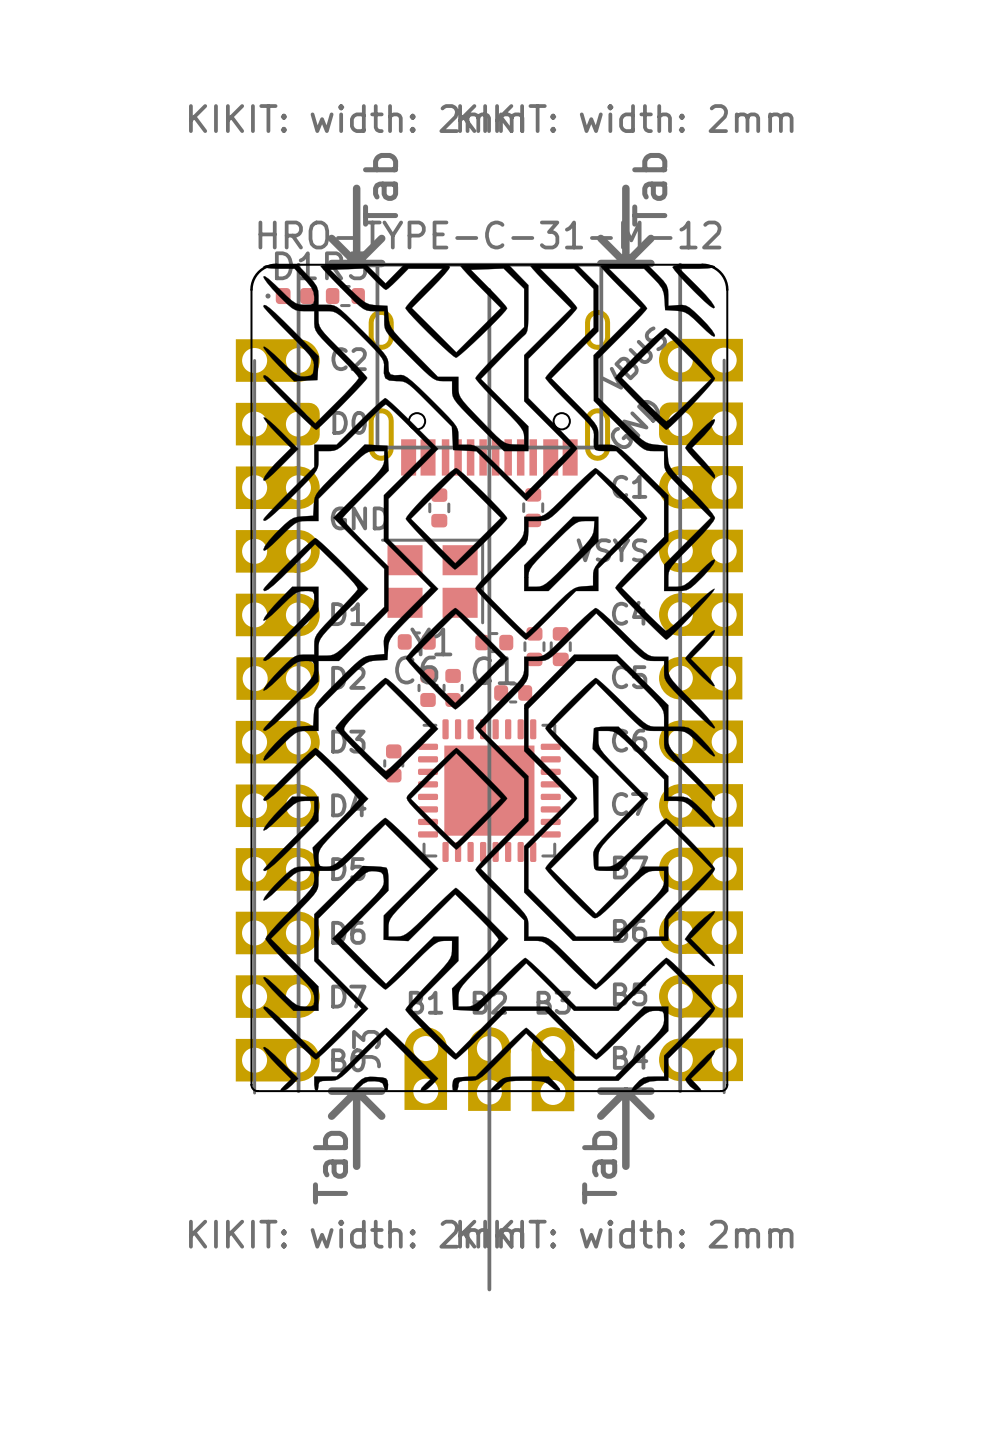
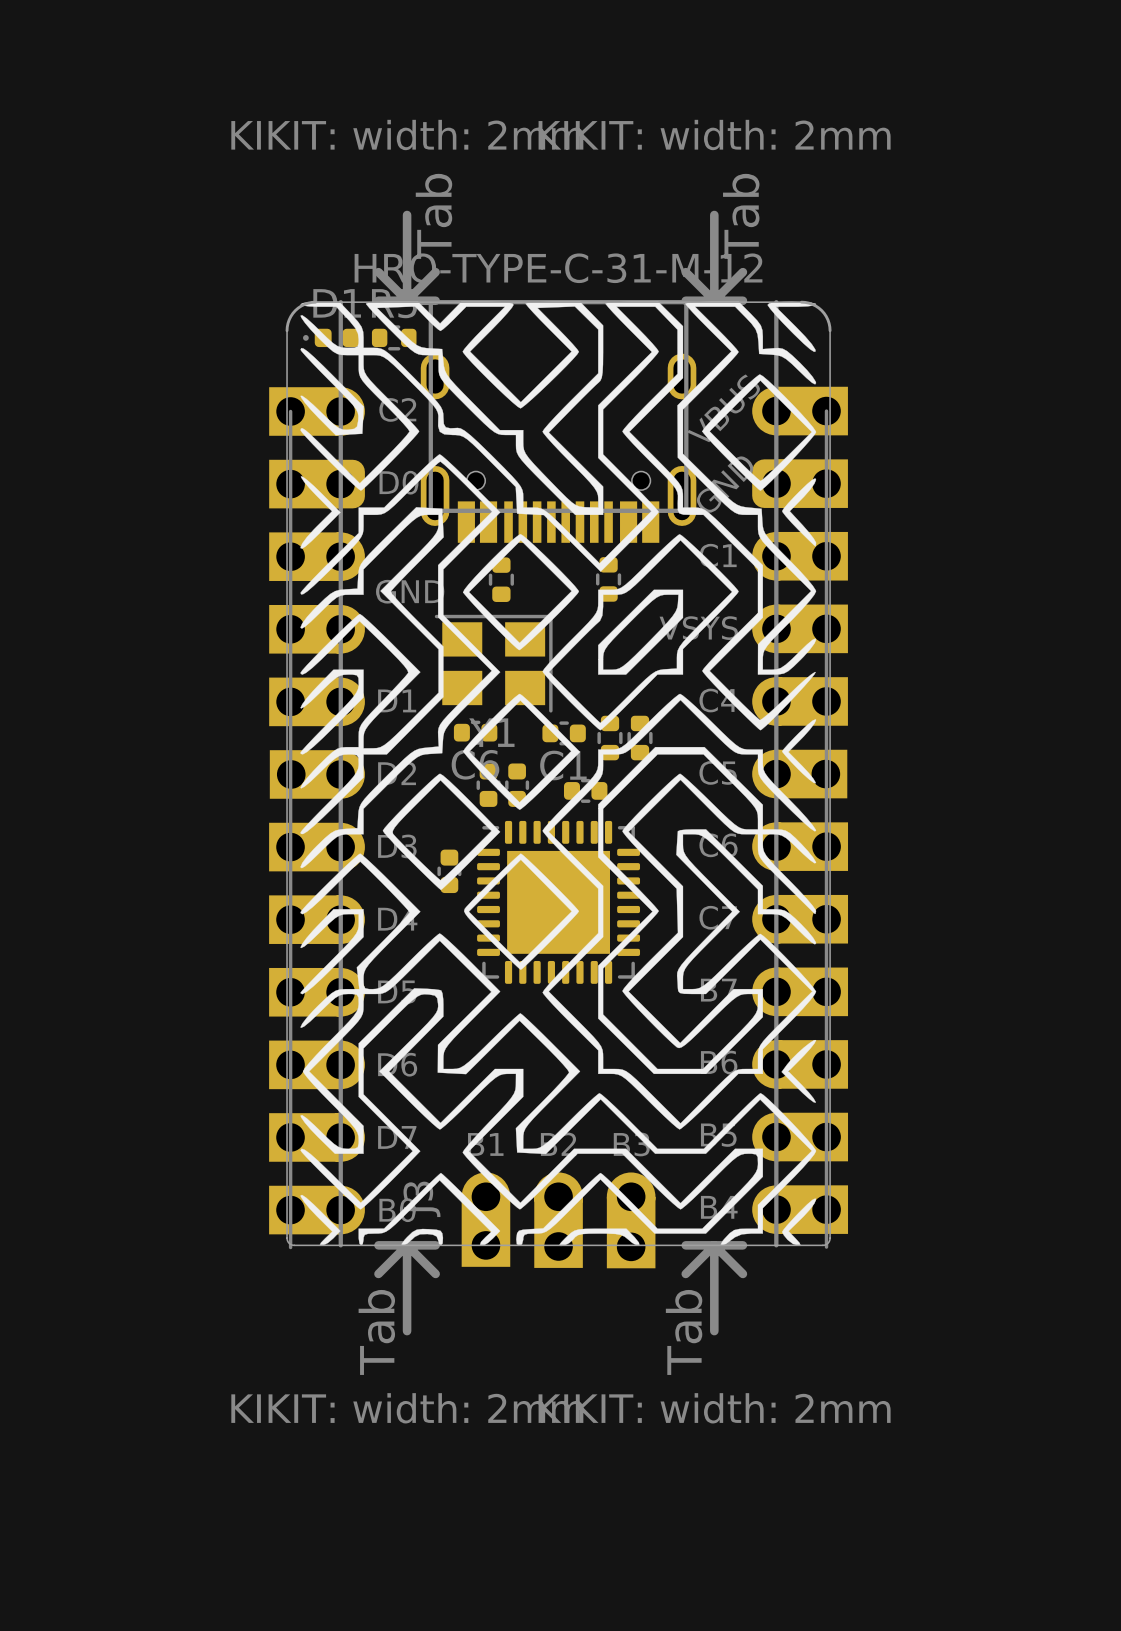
line: (489, 290) (489, 1289) -> none

